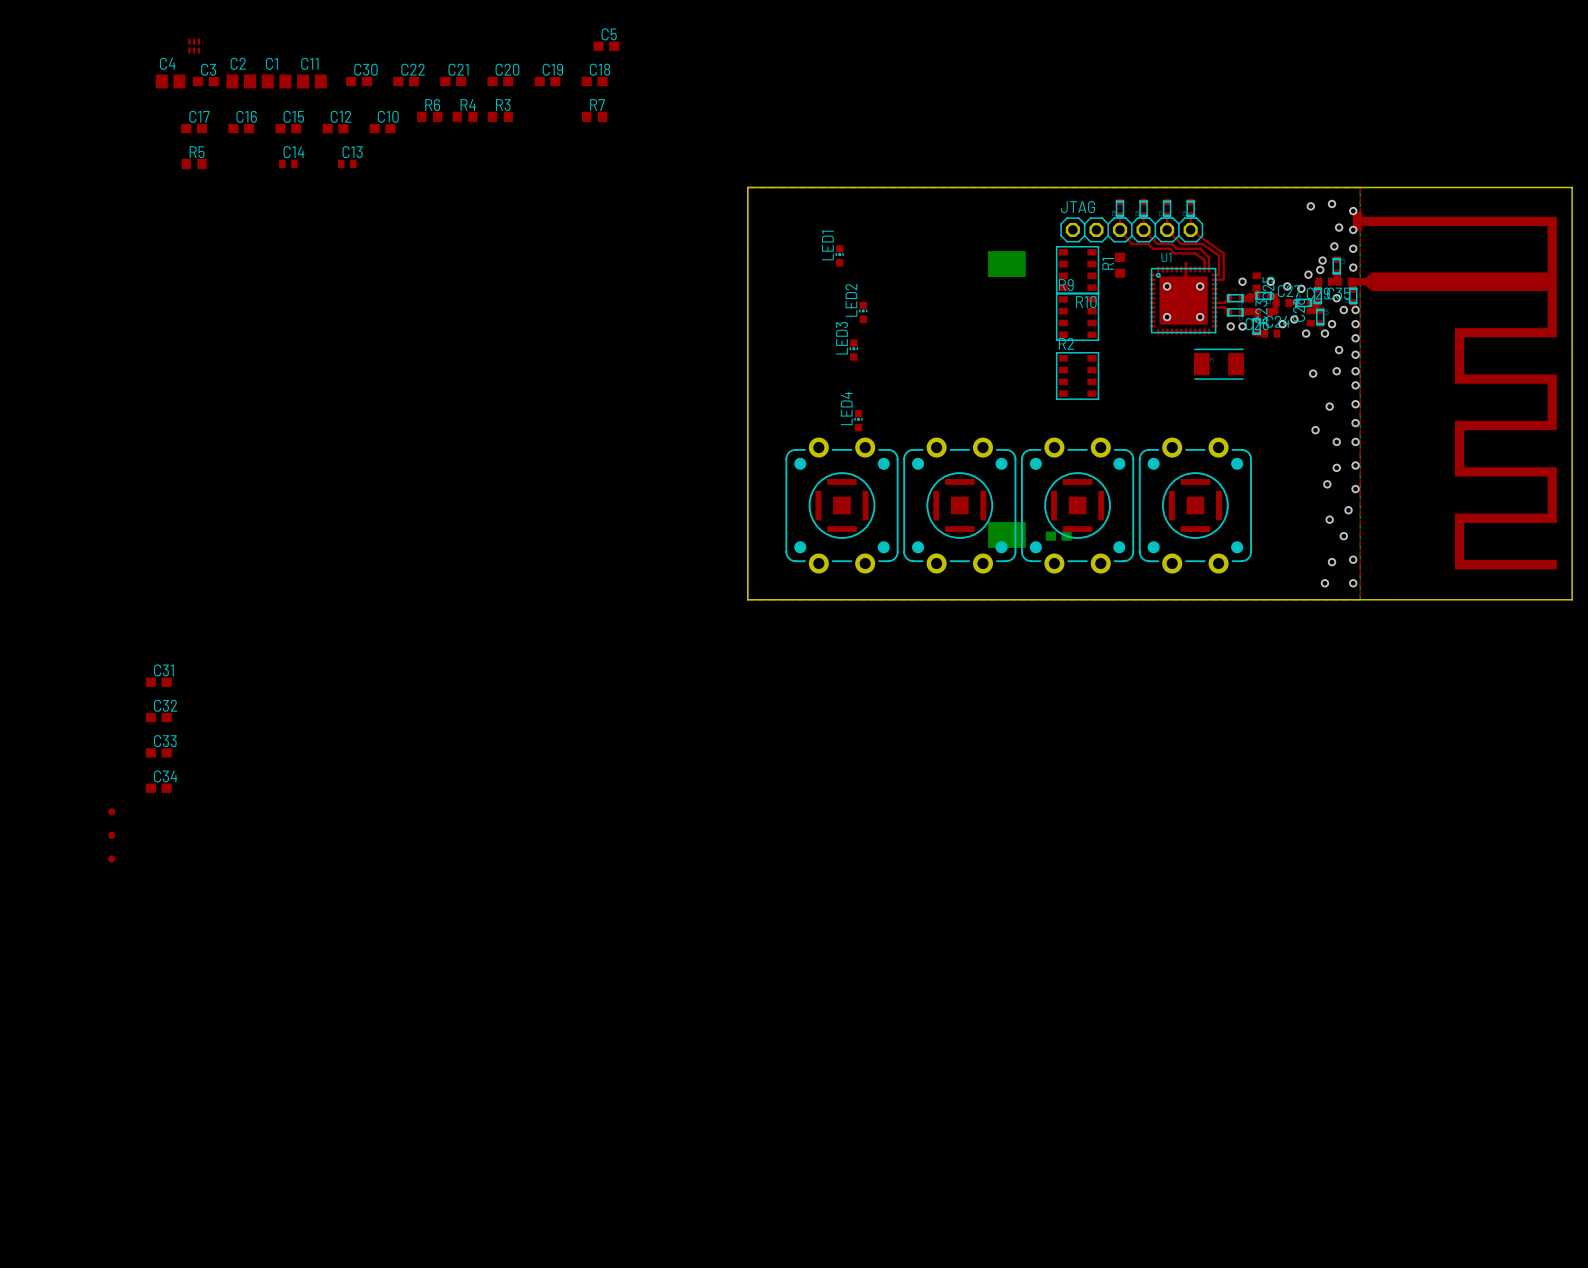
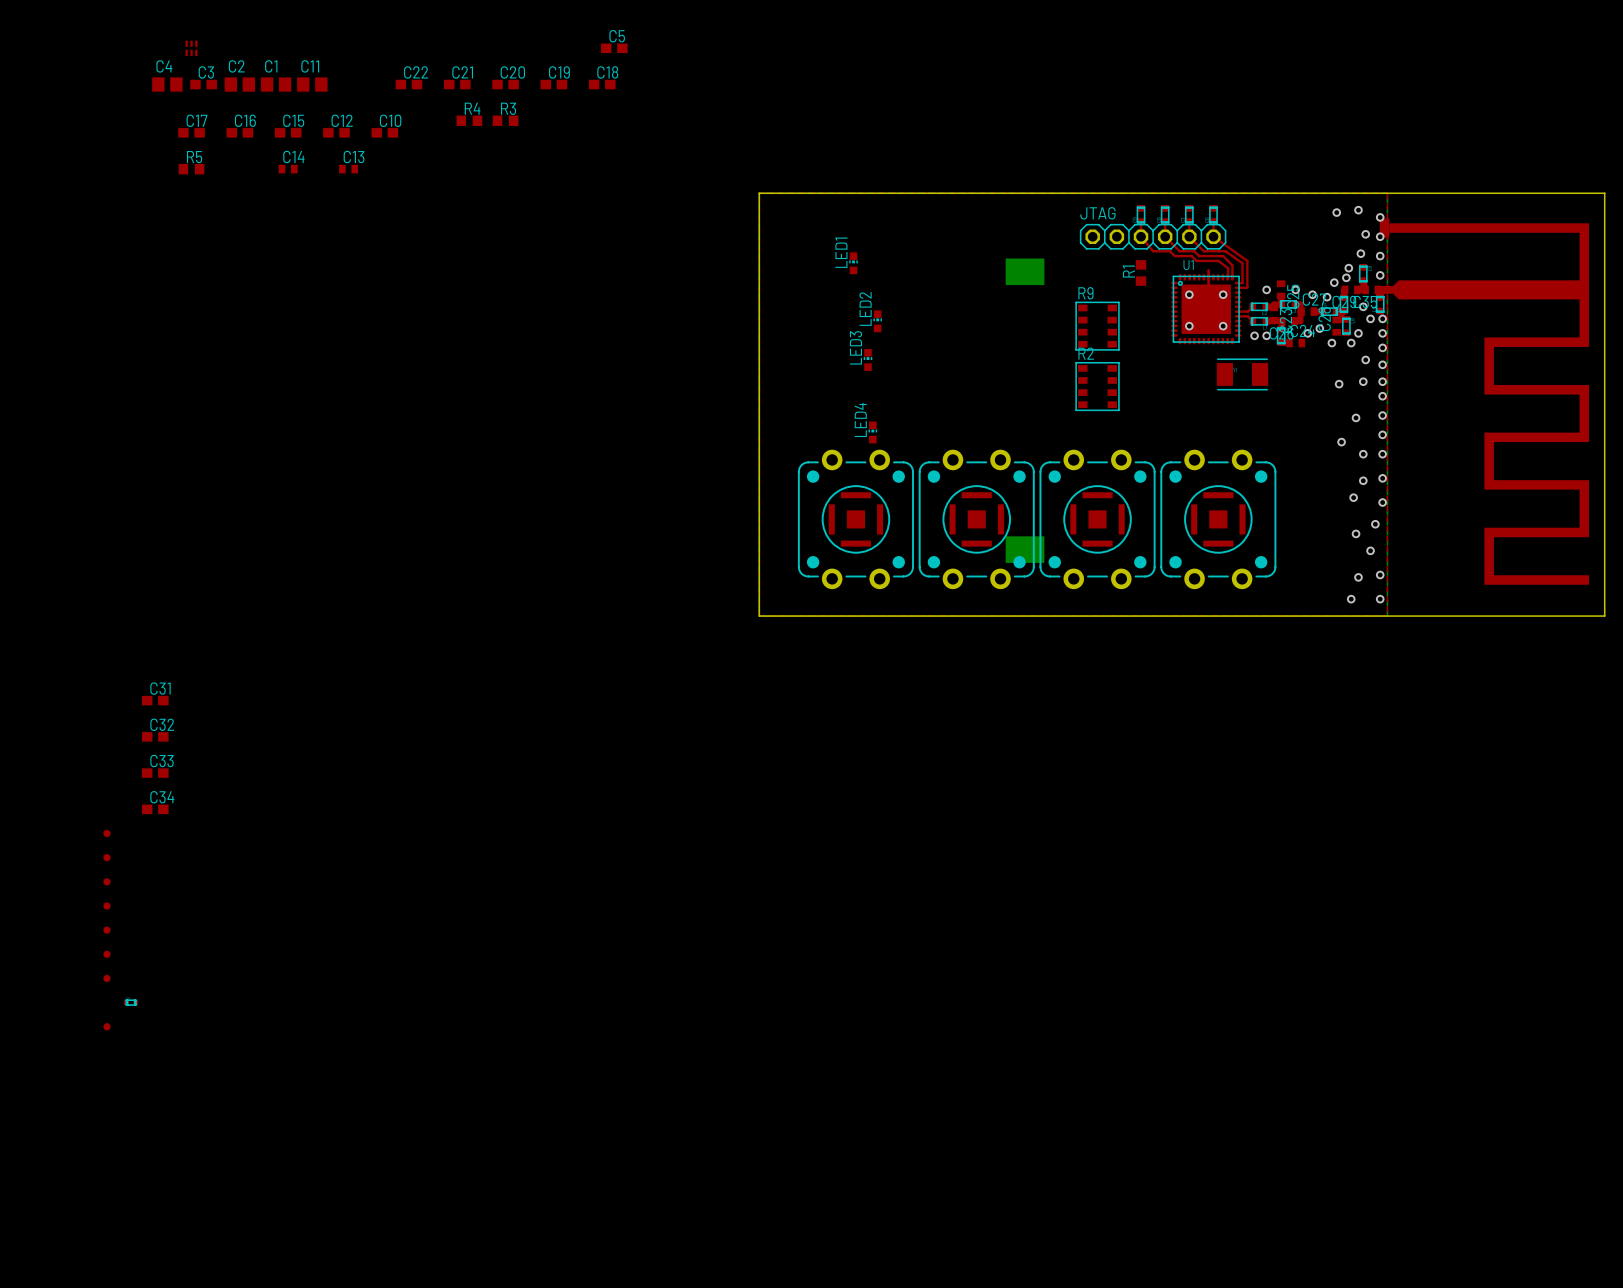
C30: (359, 81) -> none
R6: (429, 116) -> none
R7: (594, 116) -> none
R10: (1077, 269) -> none
part: (1058, 536) -> none
part: none -> (106, 905)
part: none -> (106, 930)
part: none -> (106, 954)
part: none -> (106, 978)
part: none -> (131, 1002)
part: none -> (106, 1026)

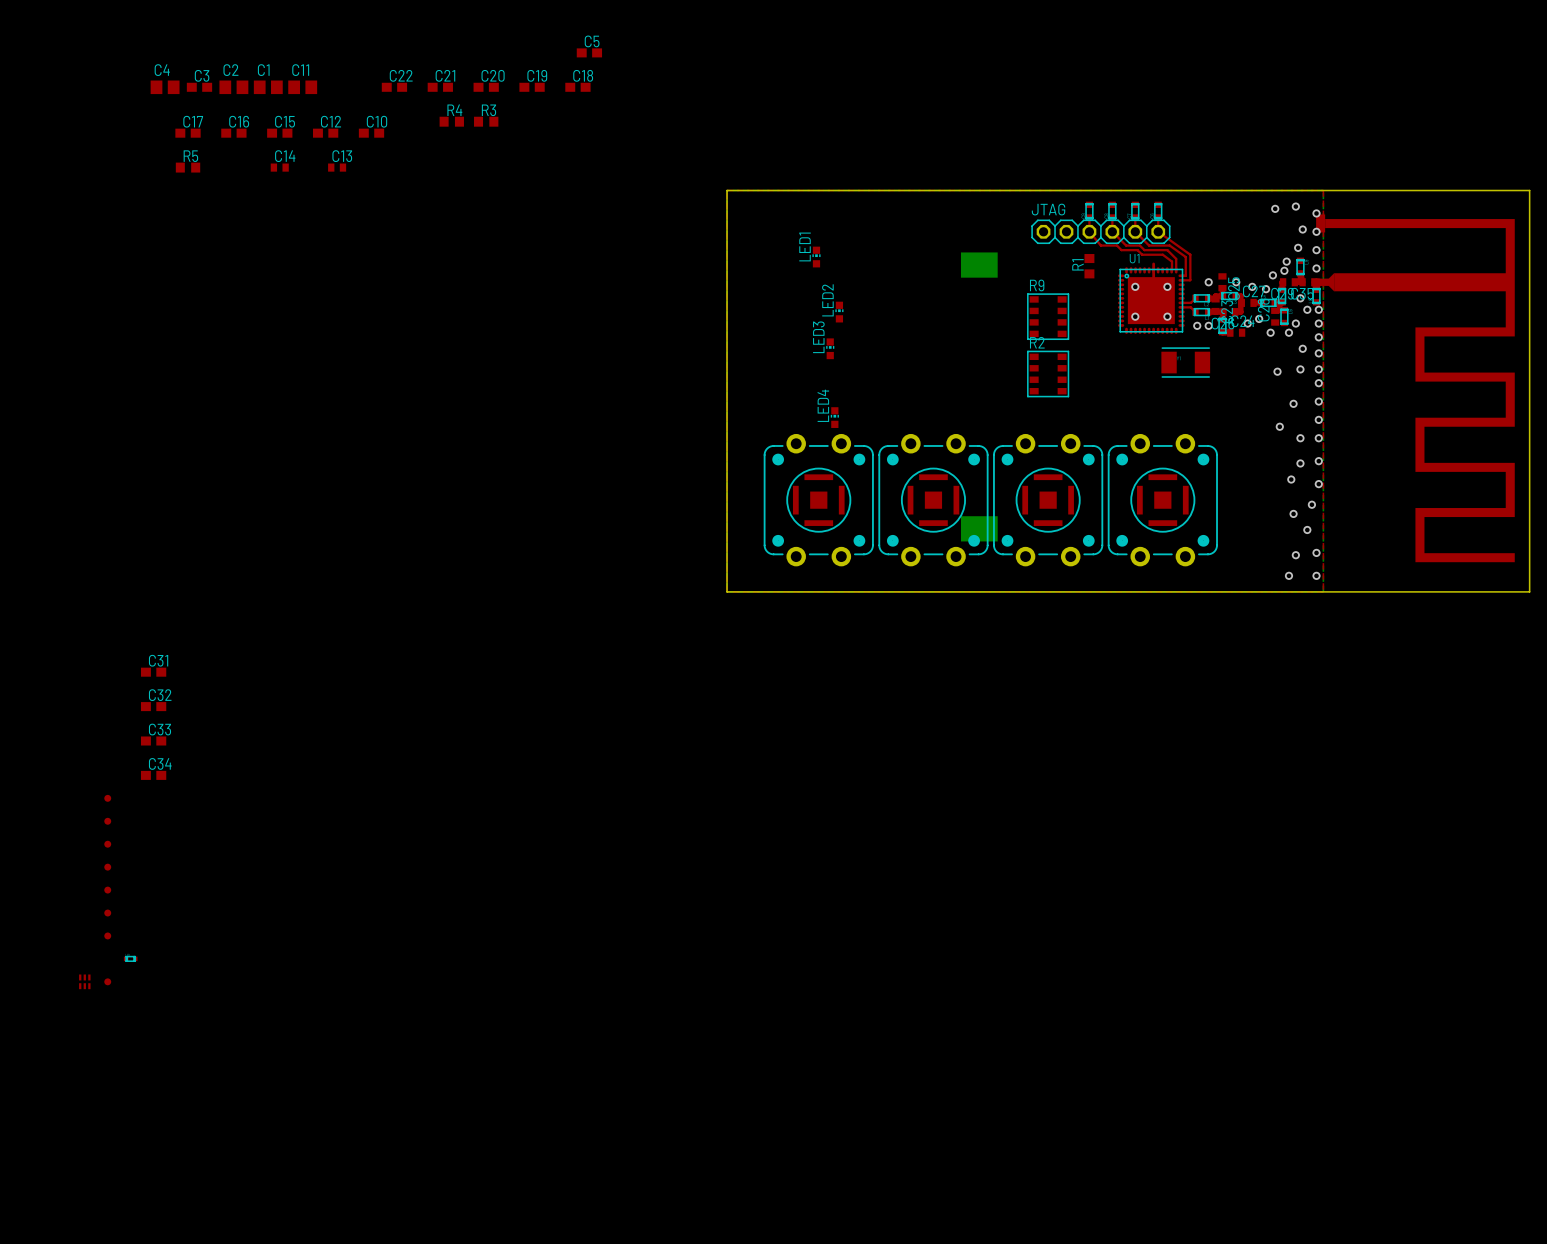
part: (191, 48) -> none
part: none -> (84, 981)

